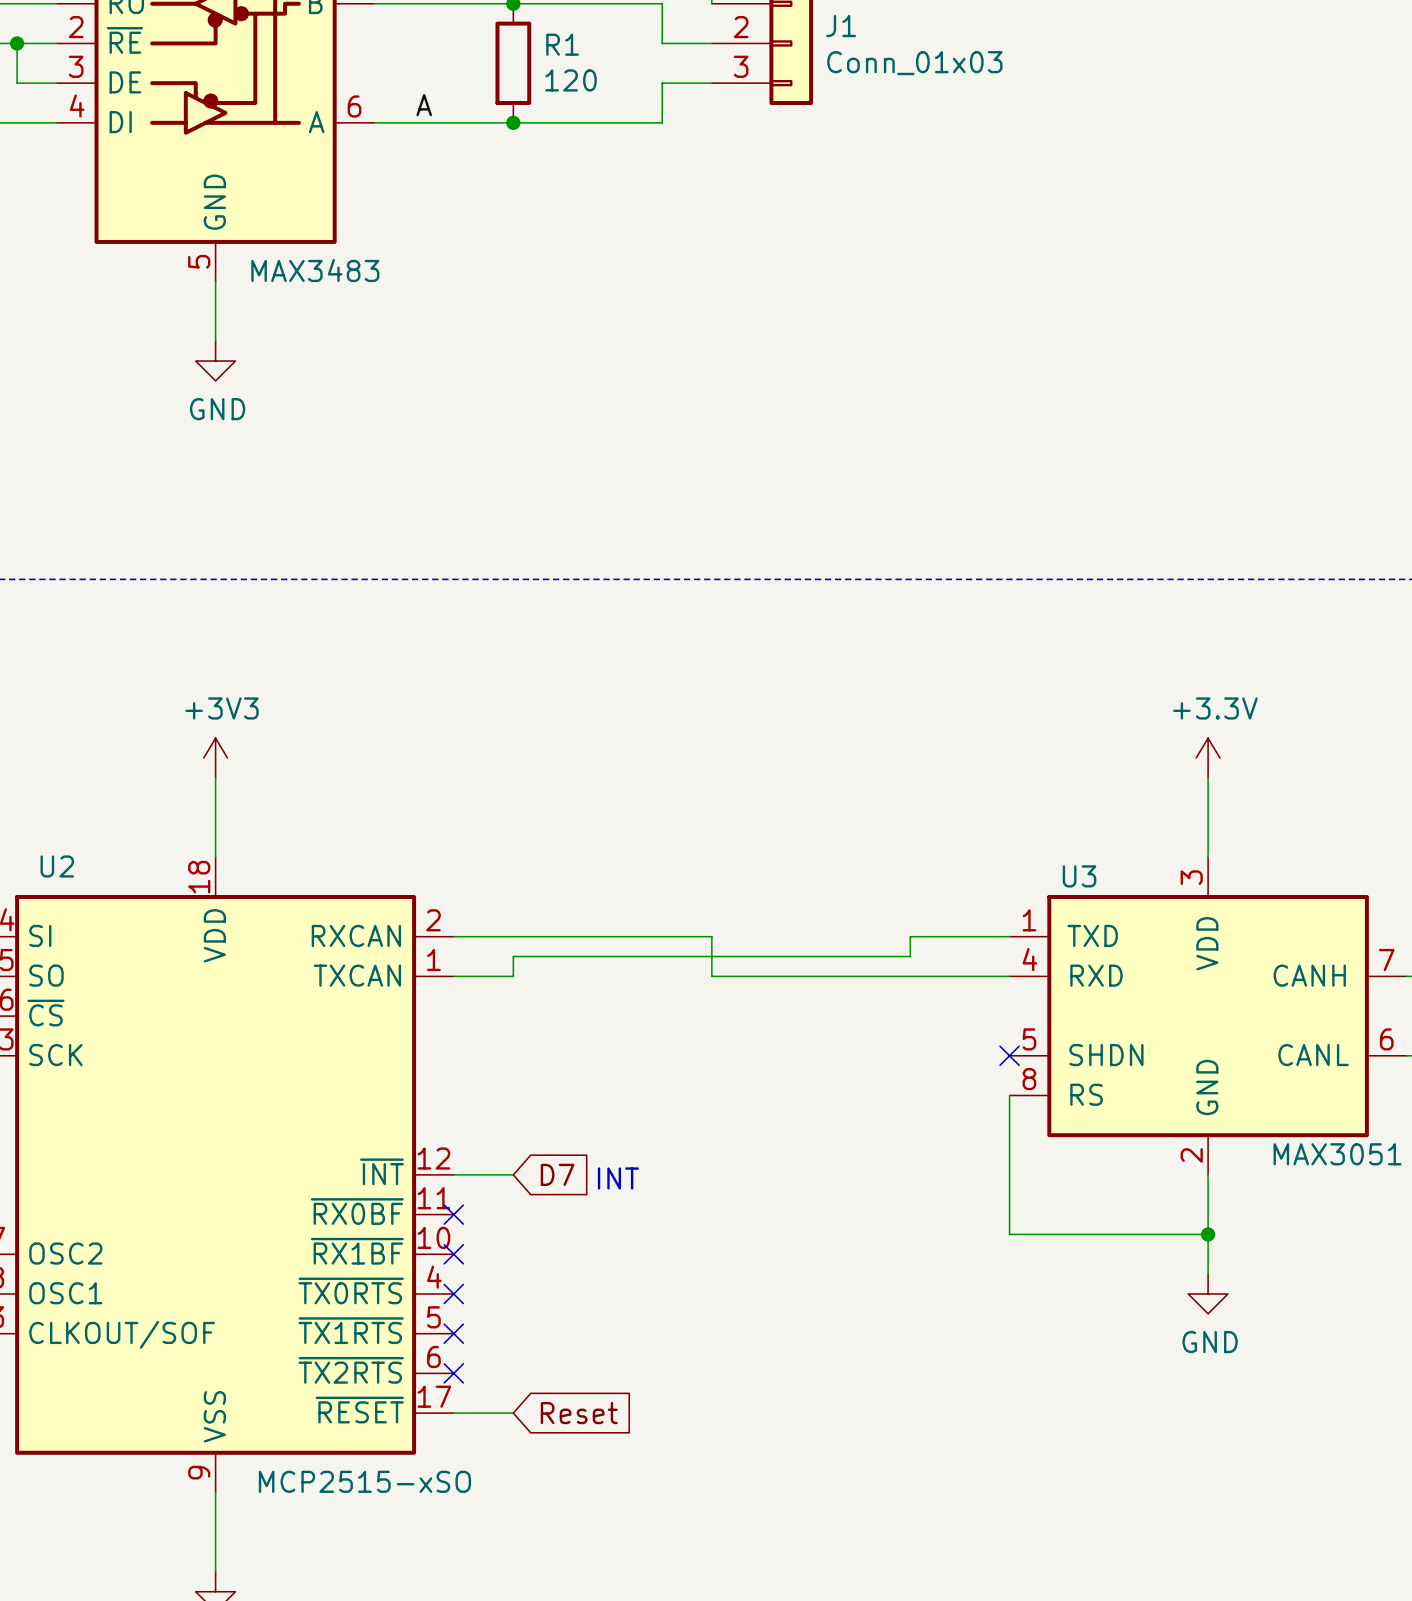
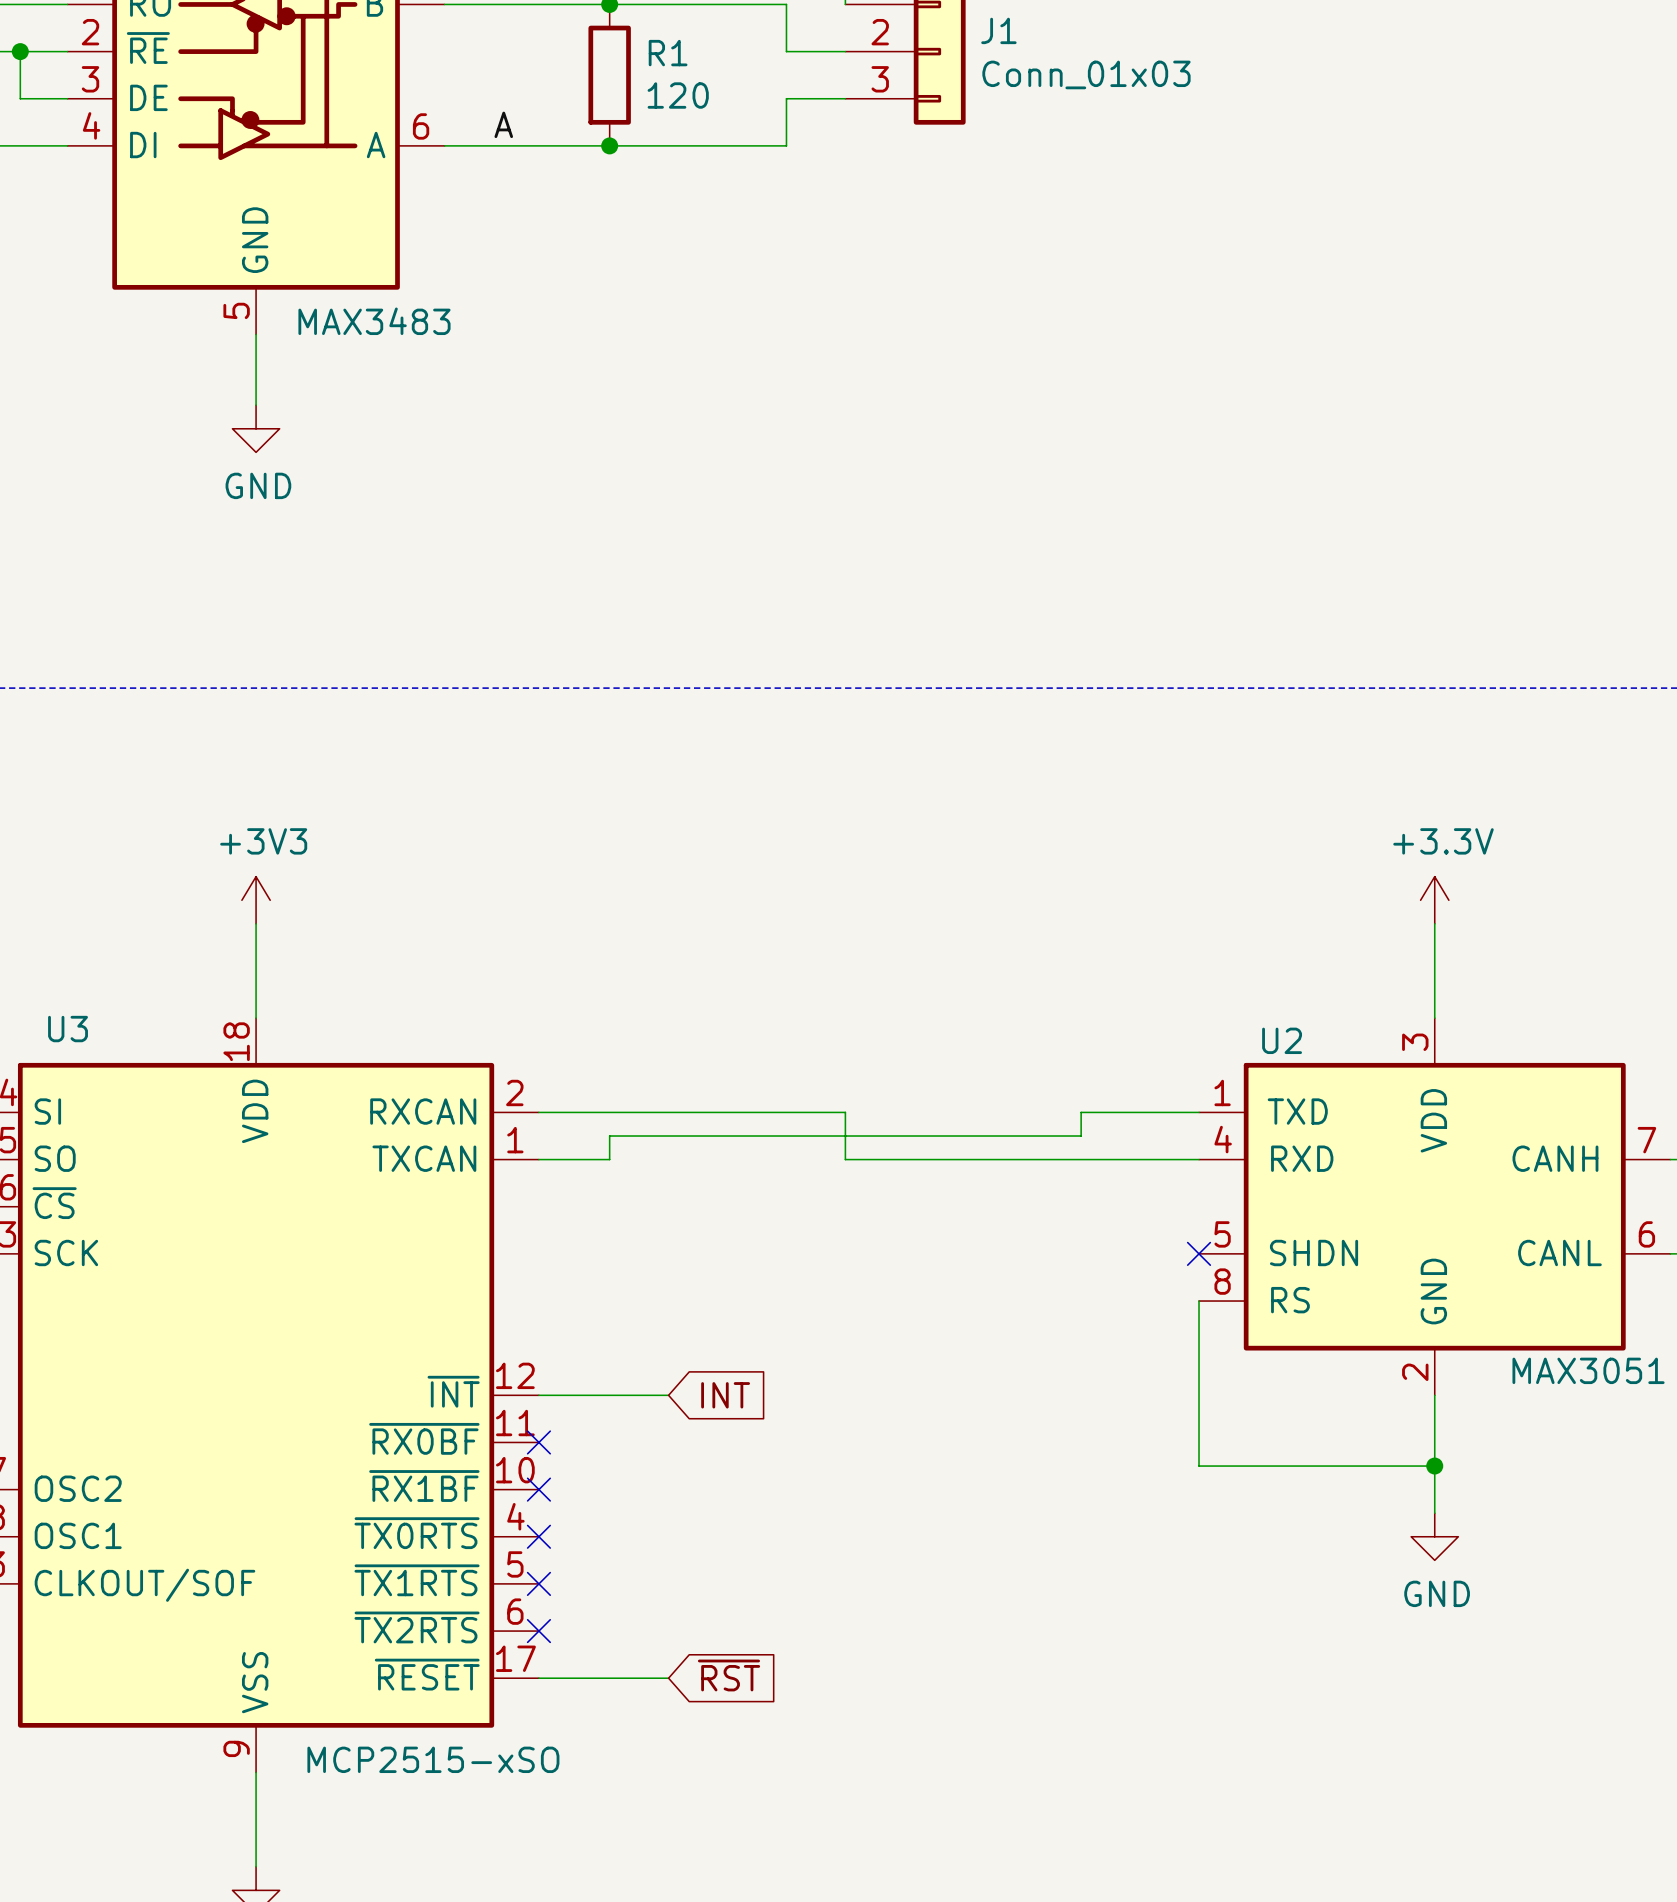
U2 name: U2 (57, 866) -> U3 (68, 1029)
U3 name: U3 (1079, 876) -> U2 (1282, 1040)
wire: none -> (609, 1395) (668, 1395)
global label: D7 (557, 1174) -> none
global label: none -> INT (725, 1395)
text: INT (618, 1178) -> none
global label: none -> ~{RST} (729, 1675)
wire: none -> (609, 1678) (668, 1678)
global label: Reset (579, 1413) -> none

